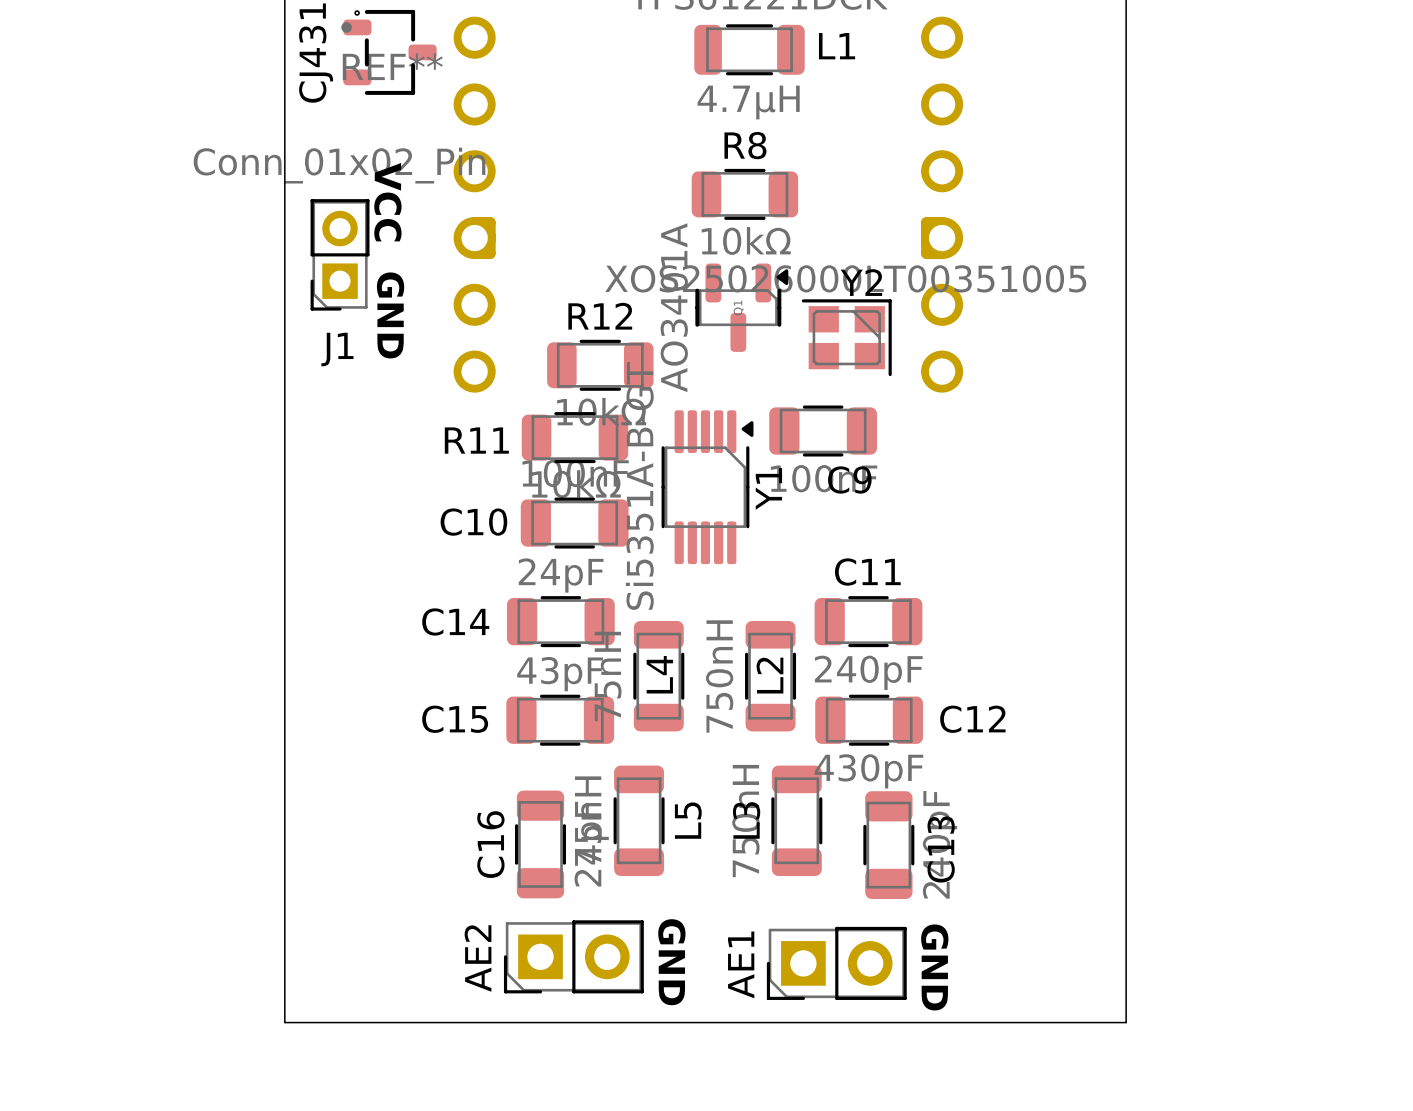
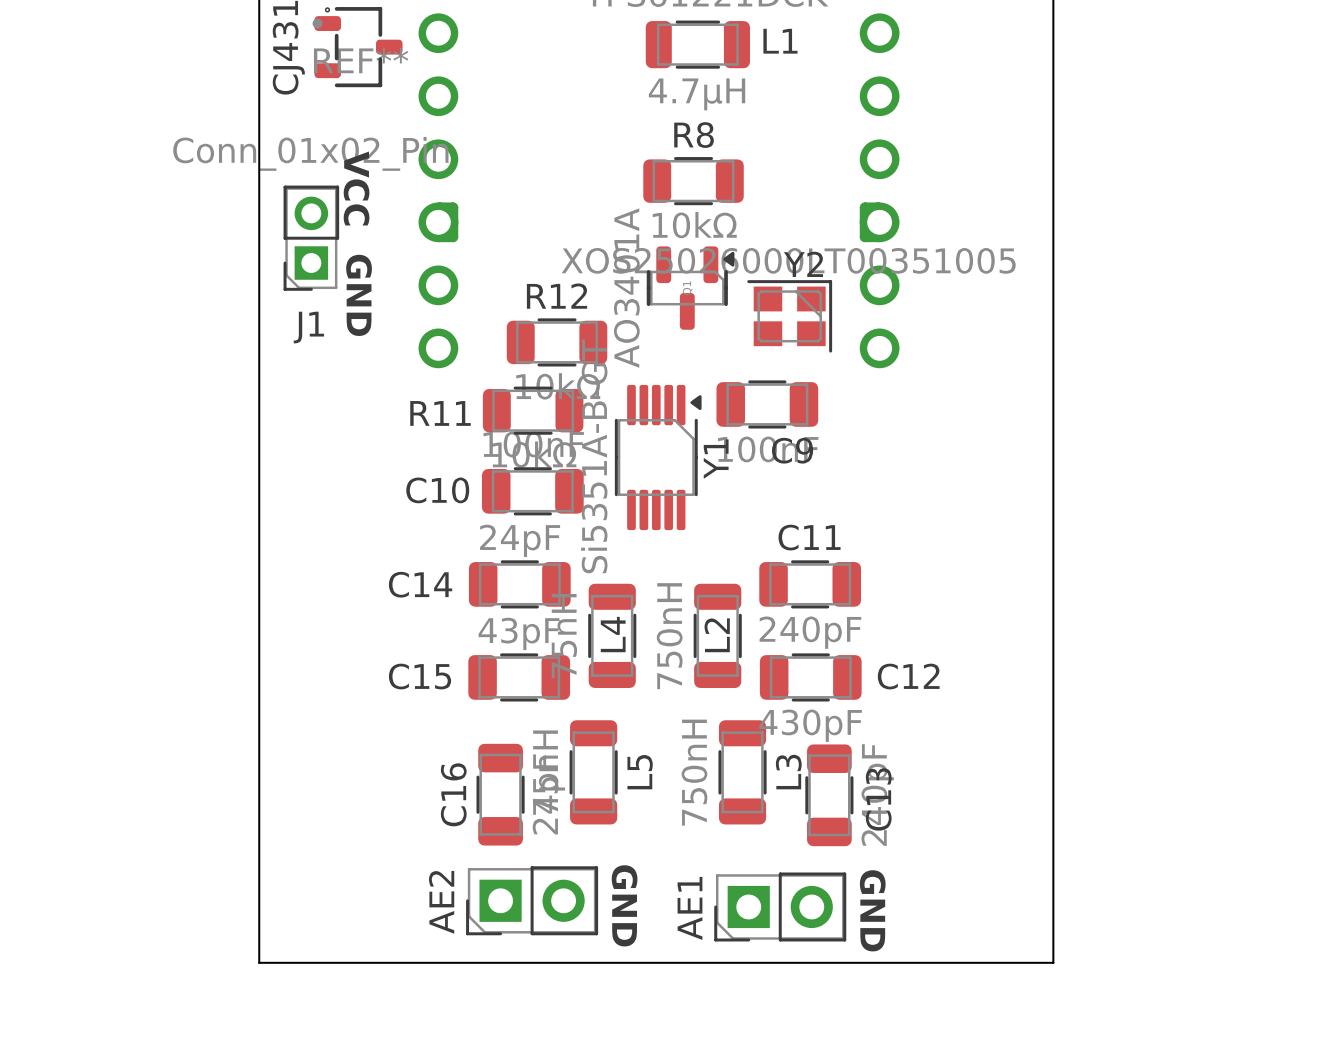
L3 name position: L3 (746, 820) -> L3 (788, 772)

